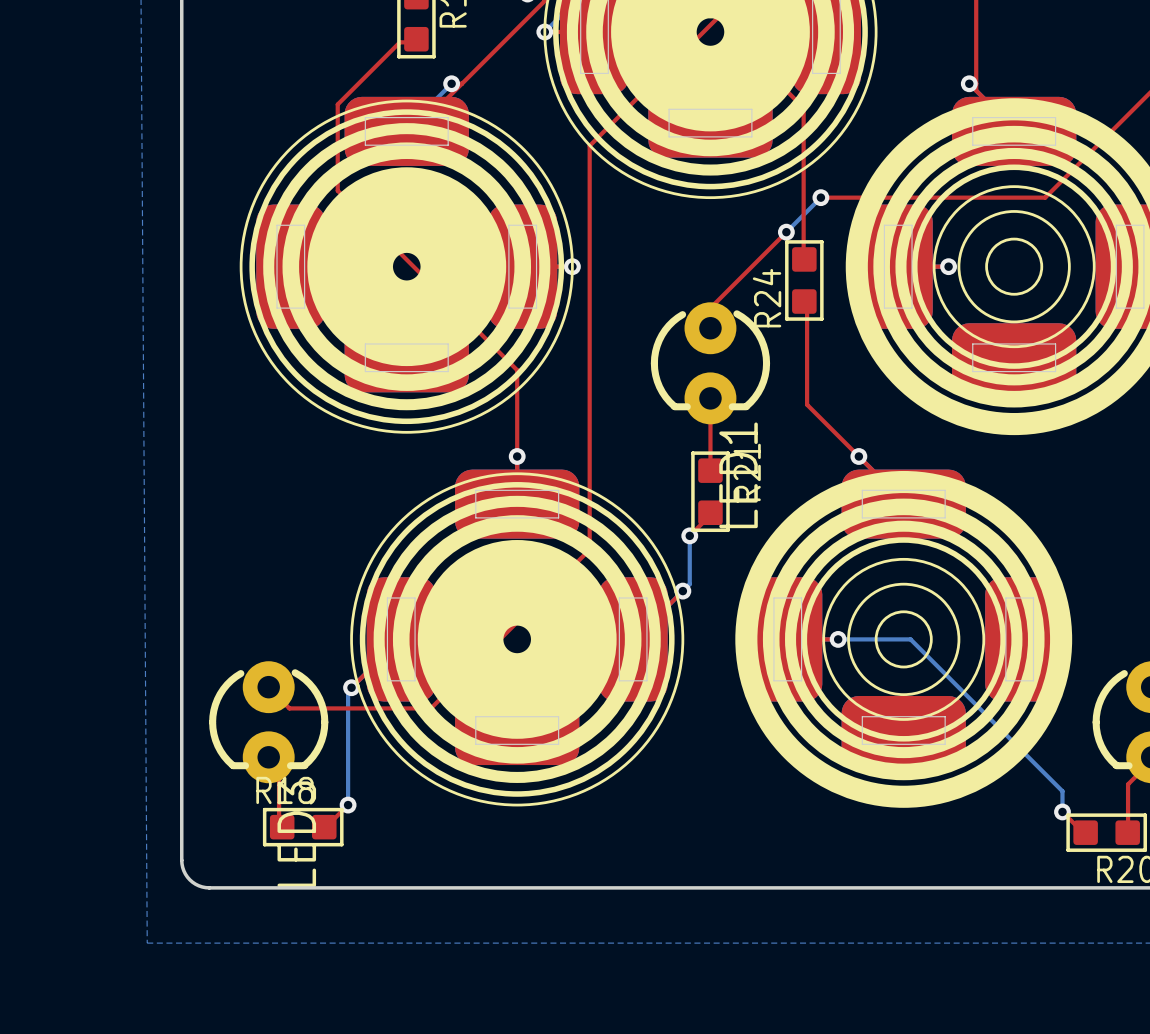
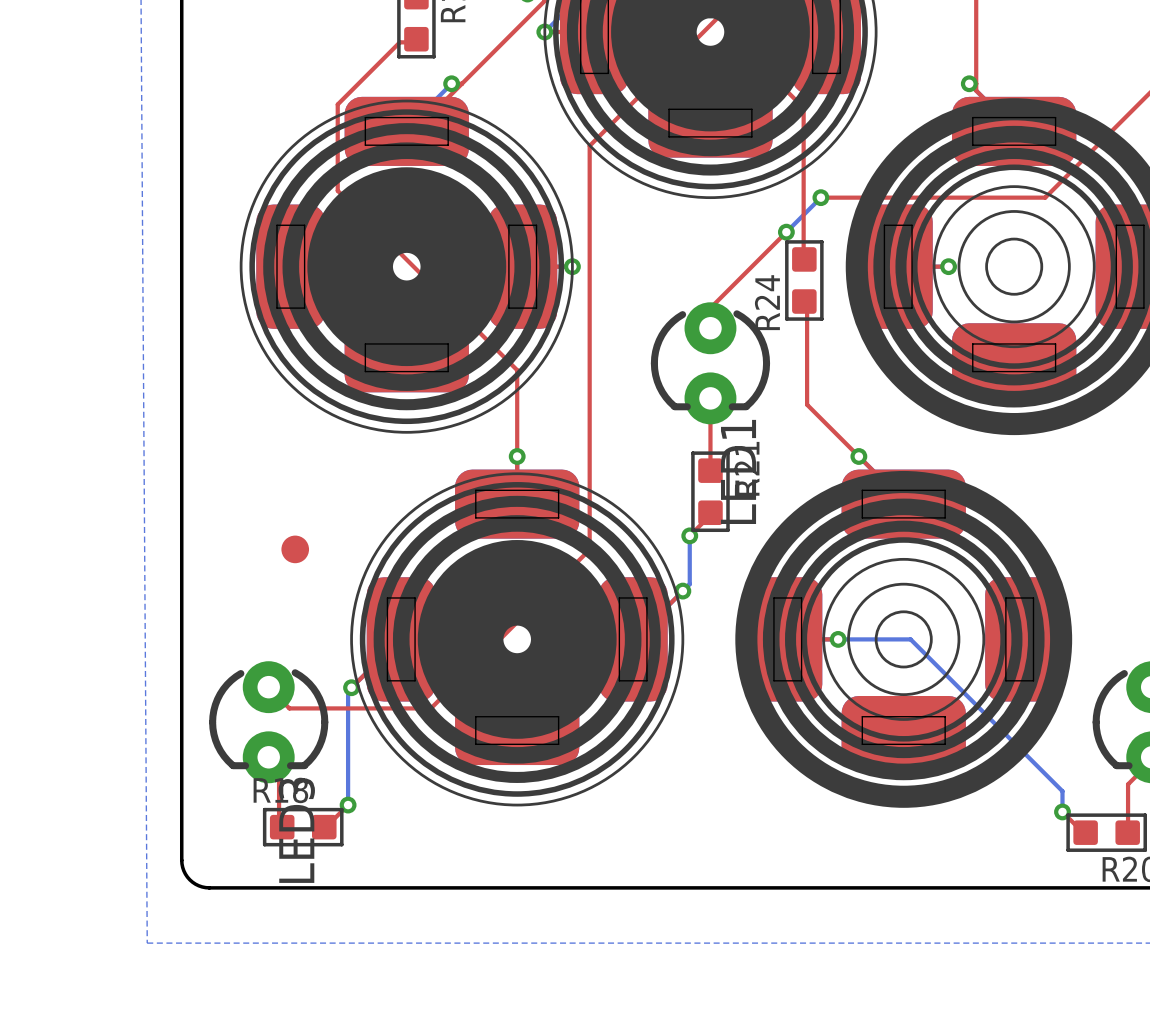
part: none -> (295, 549)

